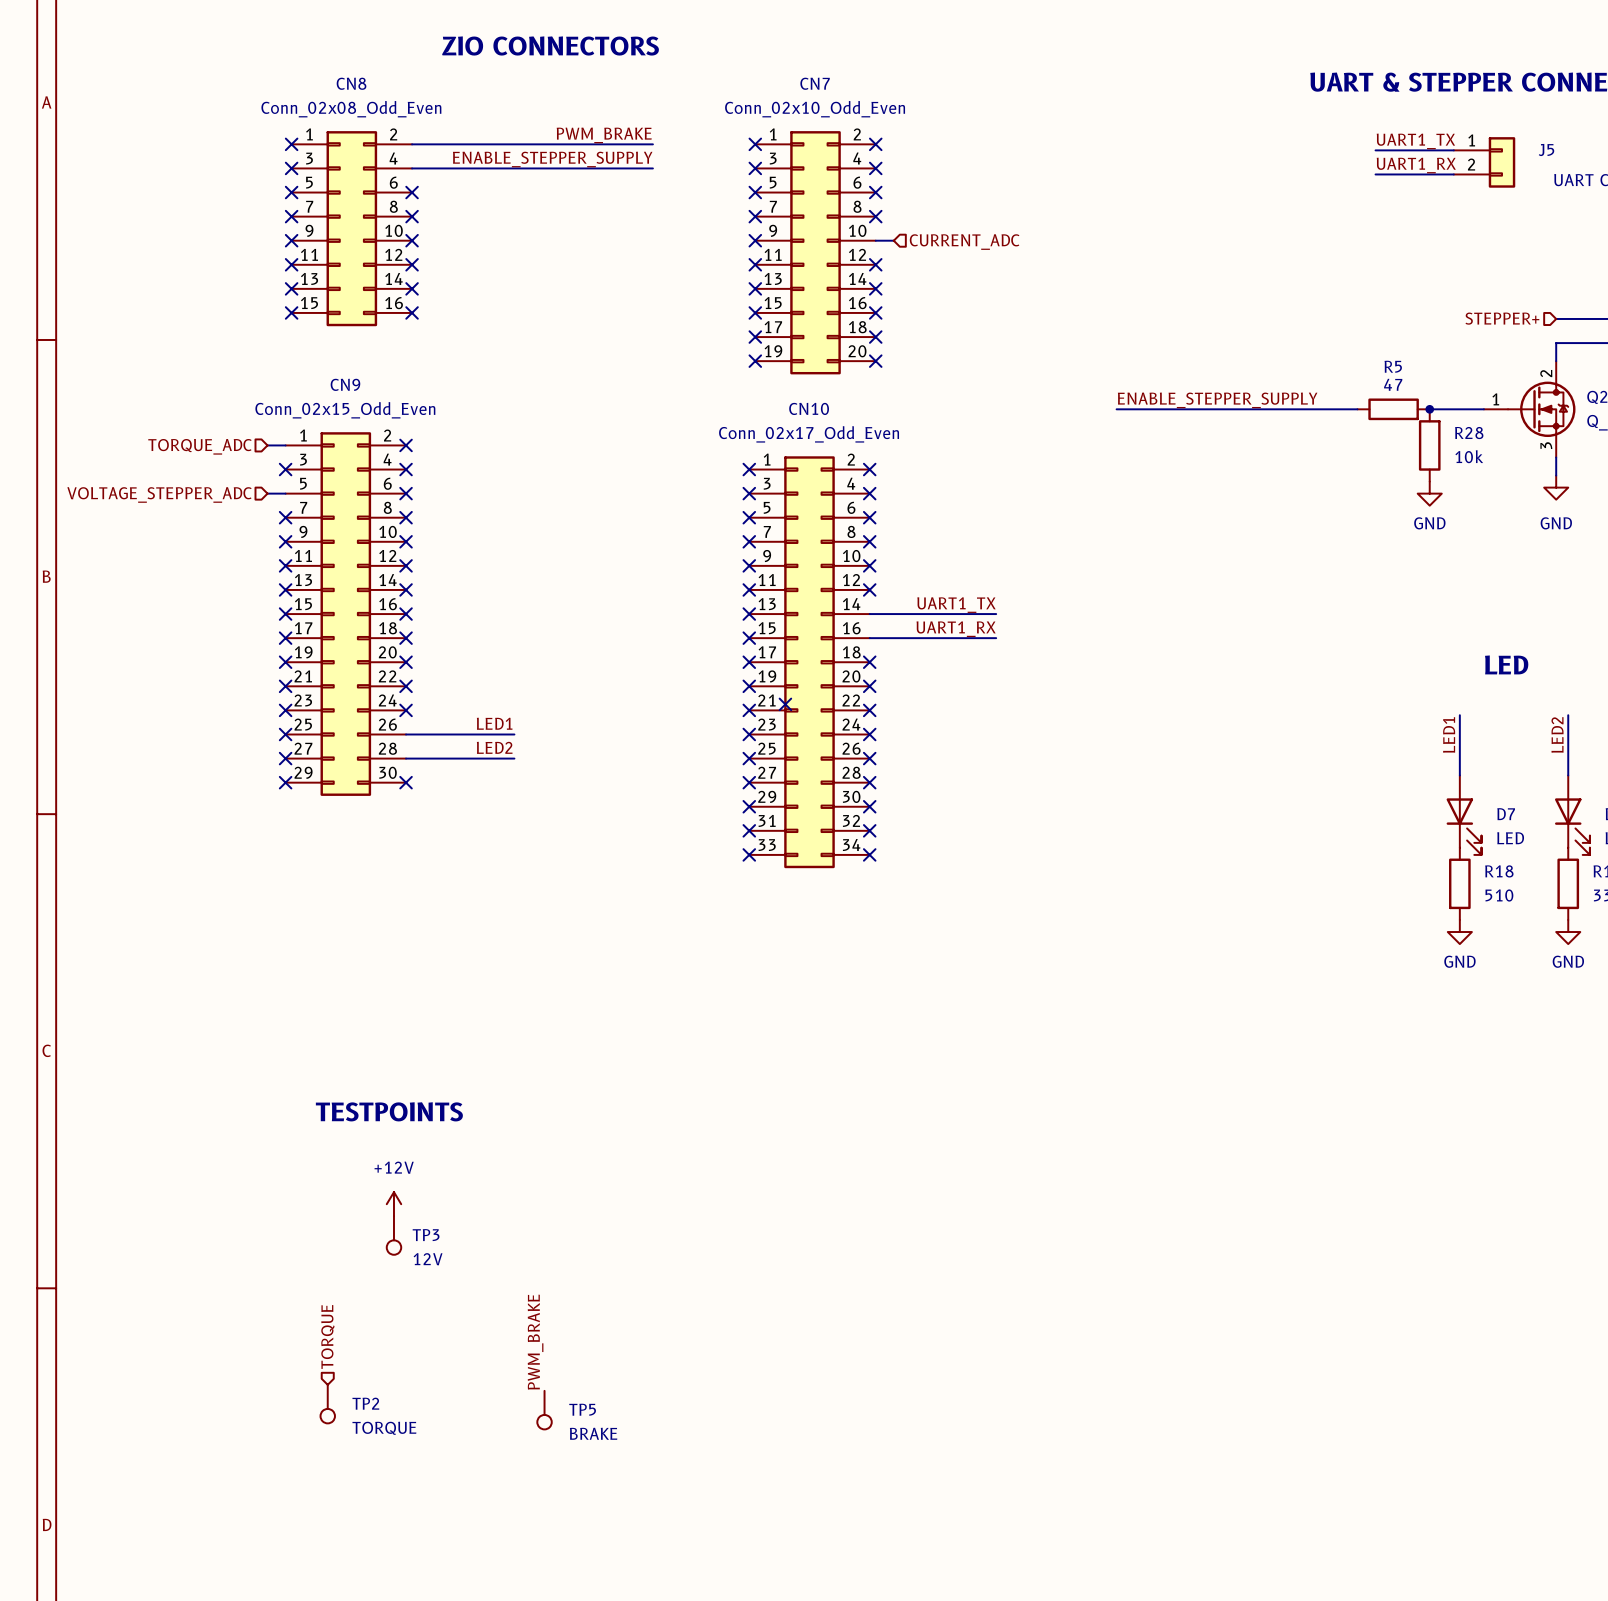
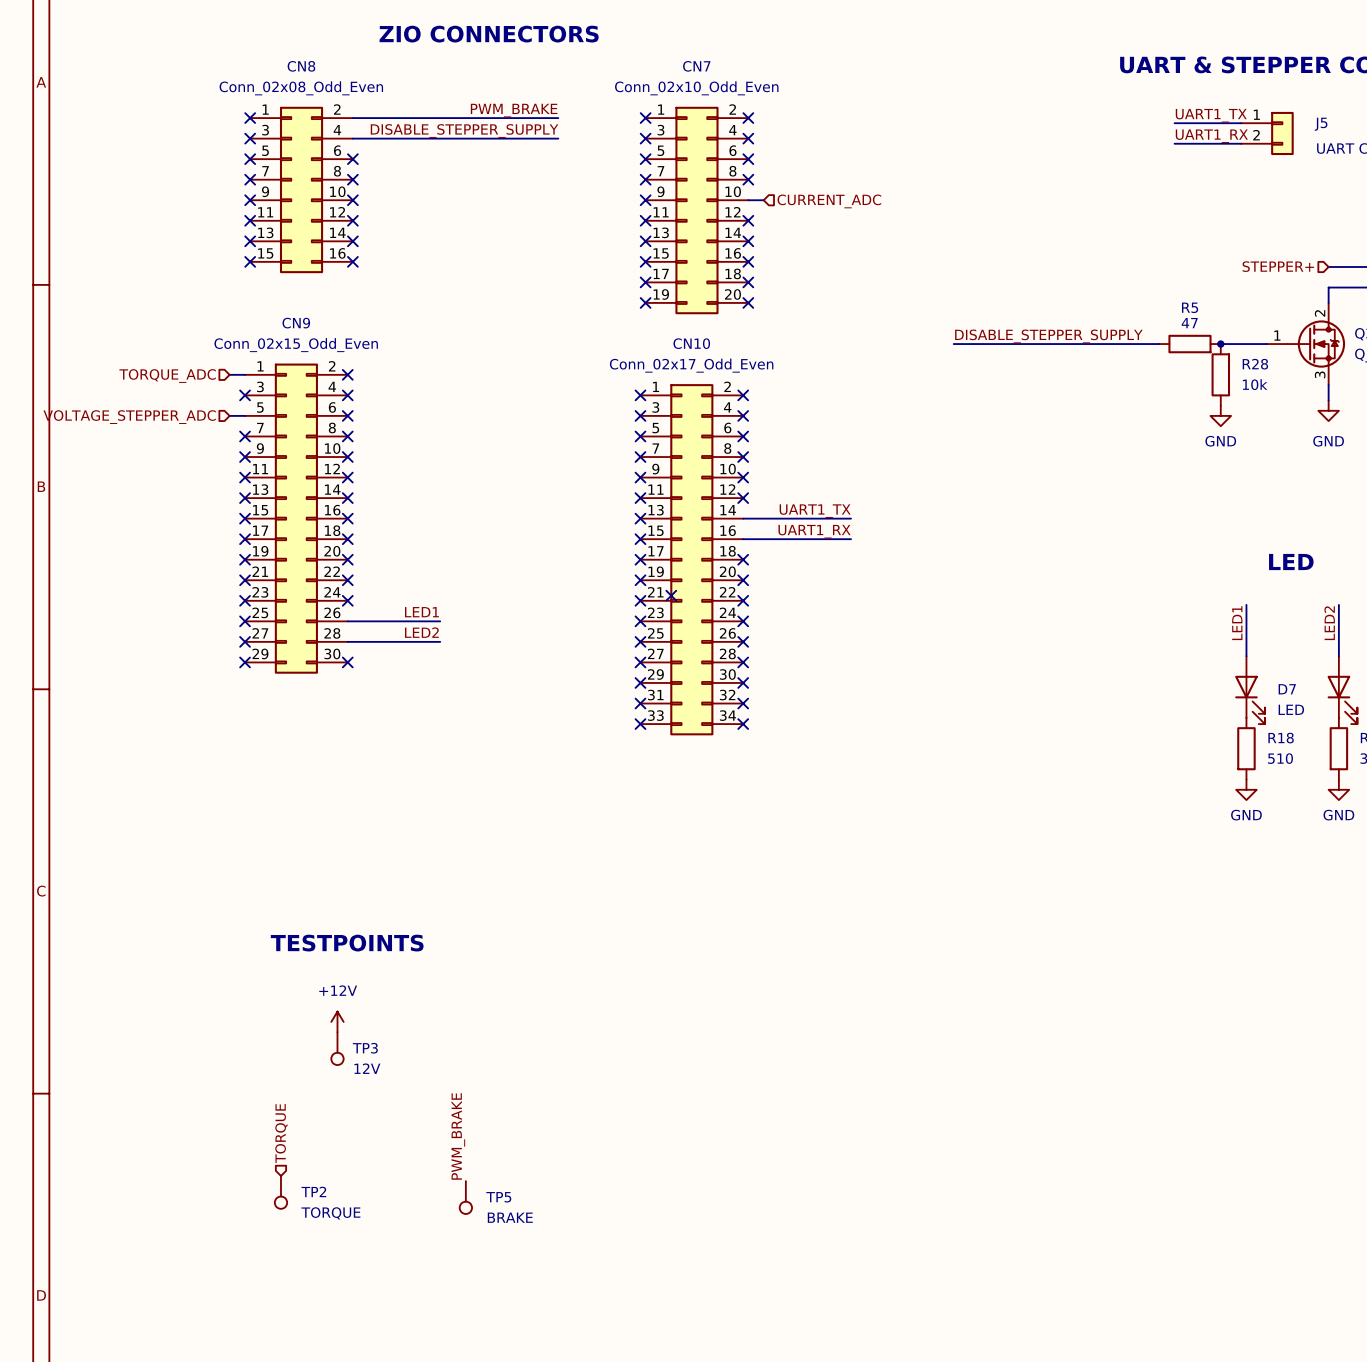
label: ENABLE_STEPPER_SUPPLY (552, 159) -> DISABLE_STEPPER_SUPPLY (464, 131)
label: ENABLE_STEPPER_SUPPLY (1217, 400) -> DISABLE_STEPPER_SUPPLY (1048, 336)

